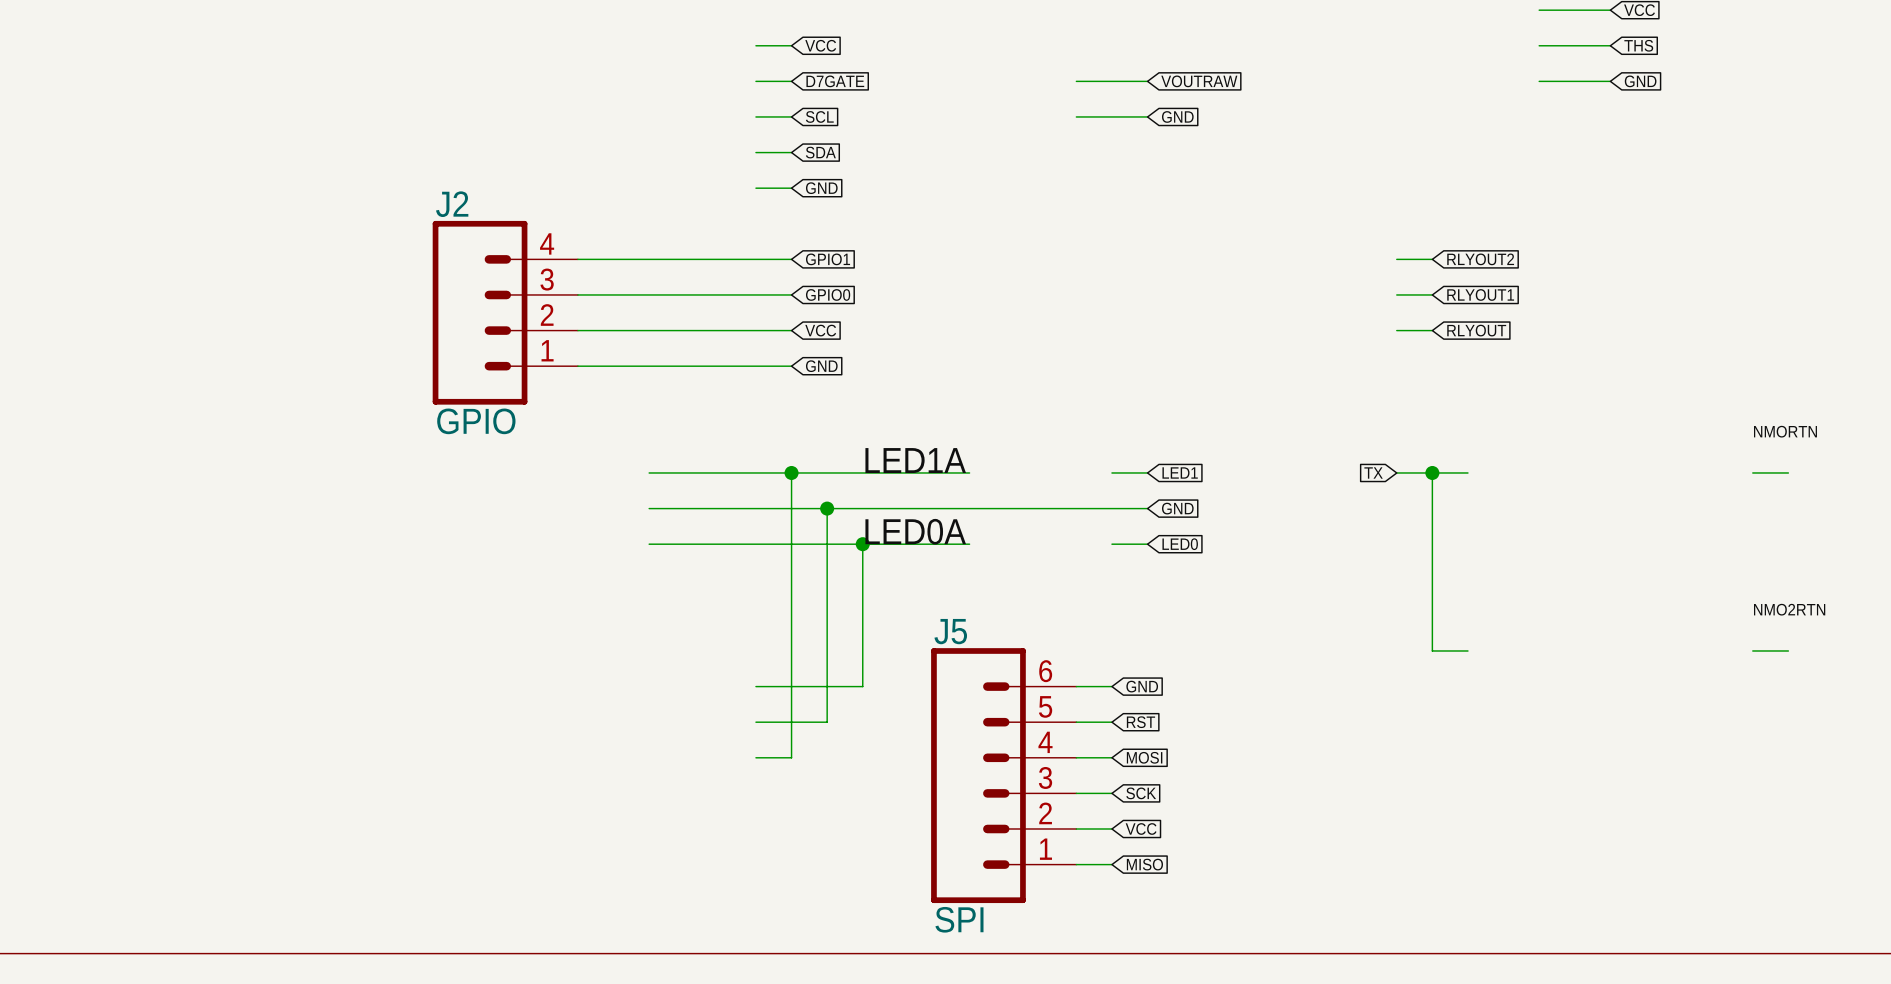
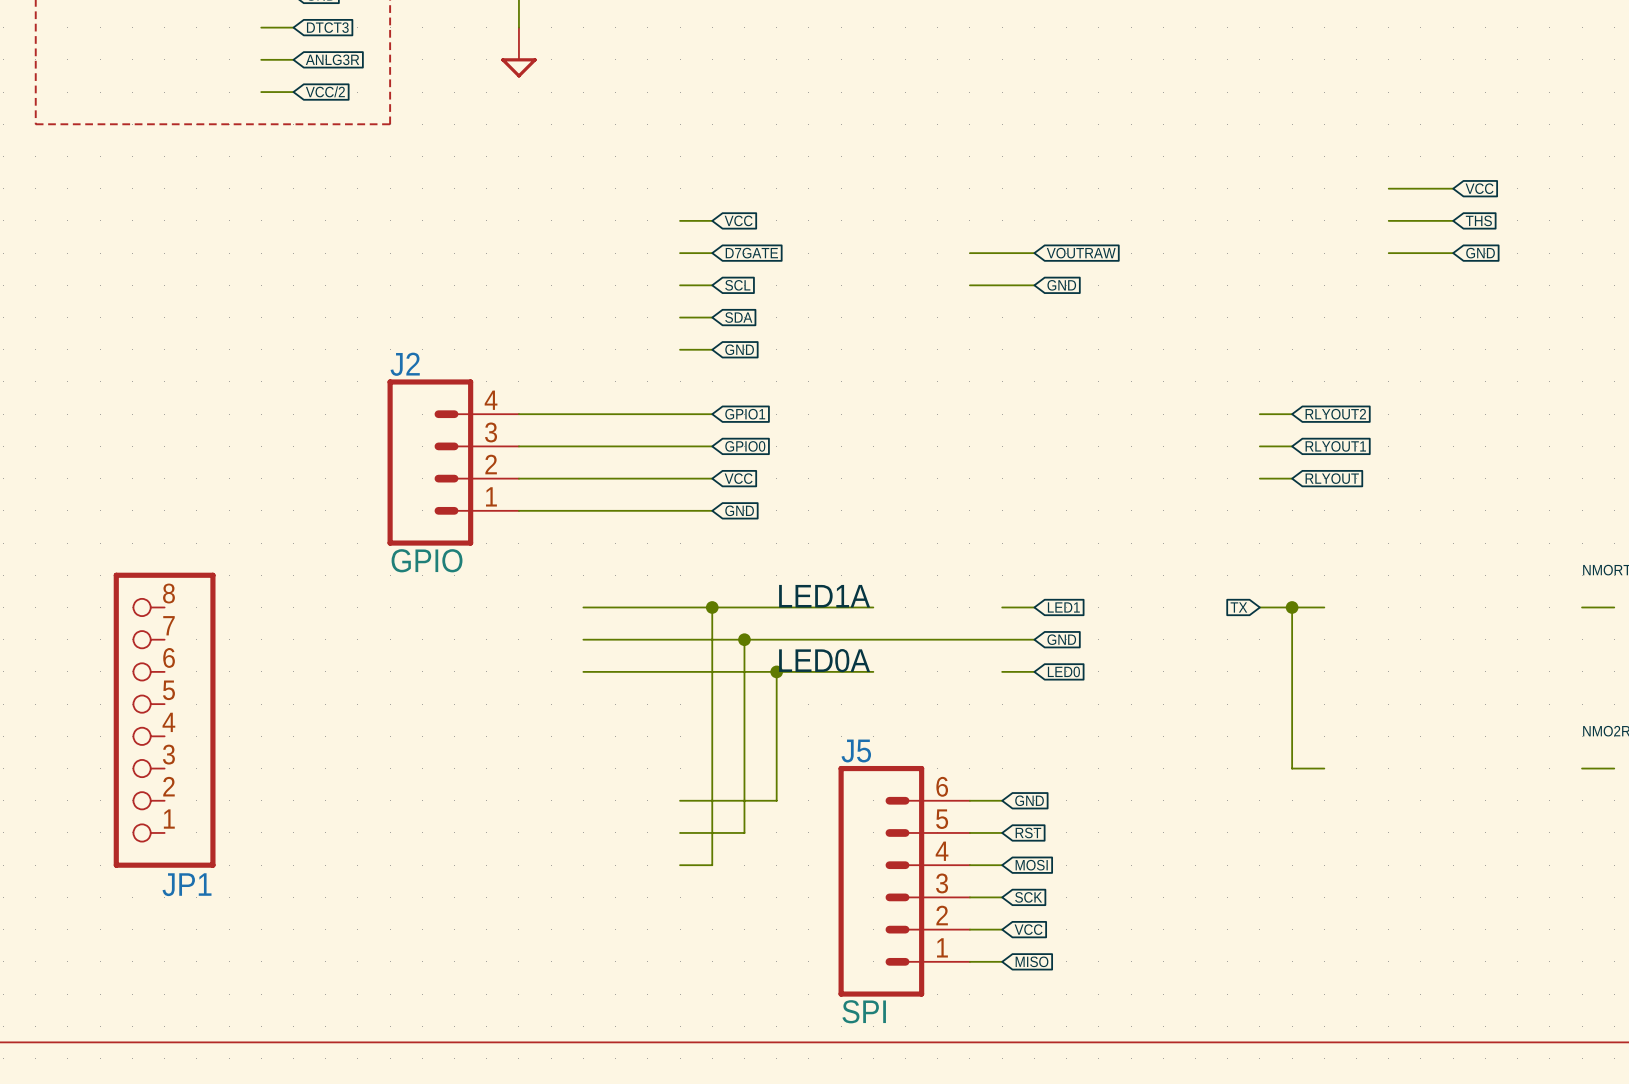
JP1: none -> (164, 720)

